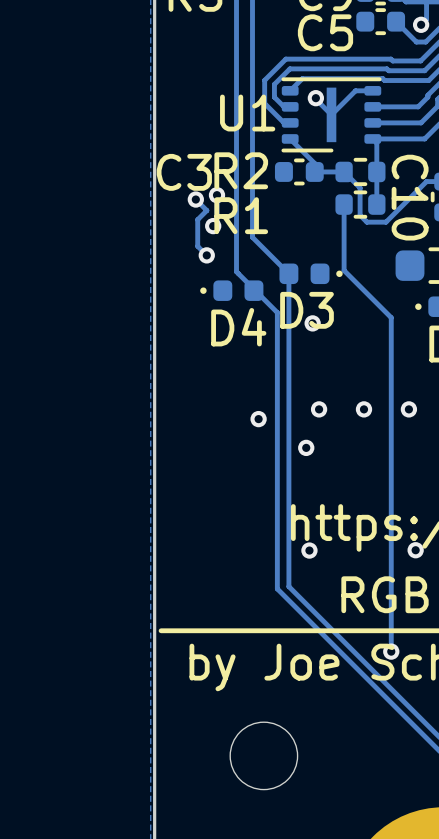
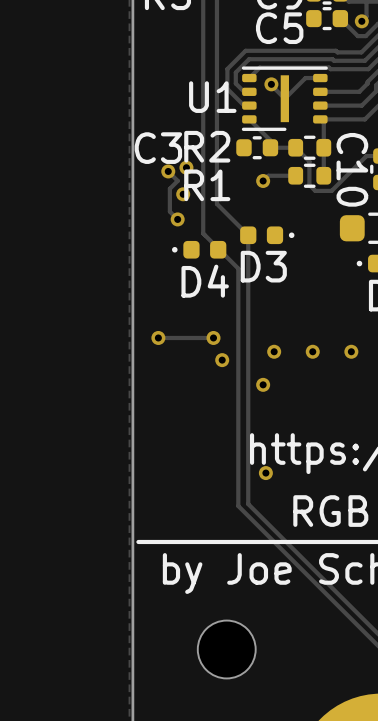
track: (344, 204) (344, 270) (391, 317) (391, 651) -> (295, 175) (268, 175) (263, 180)
via: none -> (263, 180)
via: (312, 323) -> none
via: none -> (158, 337)
track: none -> (213, 337) (158, 337)
via: none -> (213, 337)
via: (415, 550) -> none
via: (391, 651) -> none

